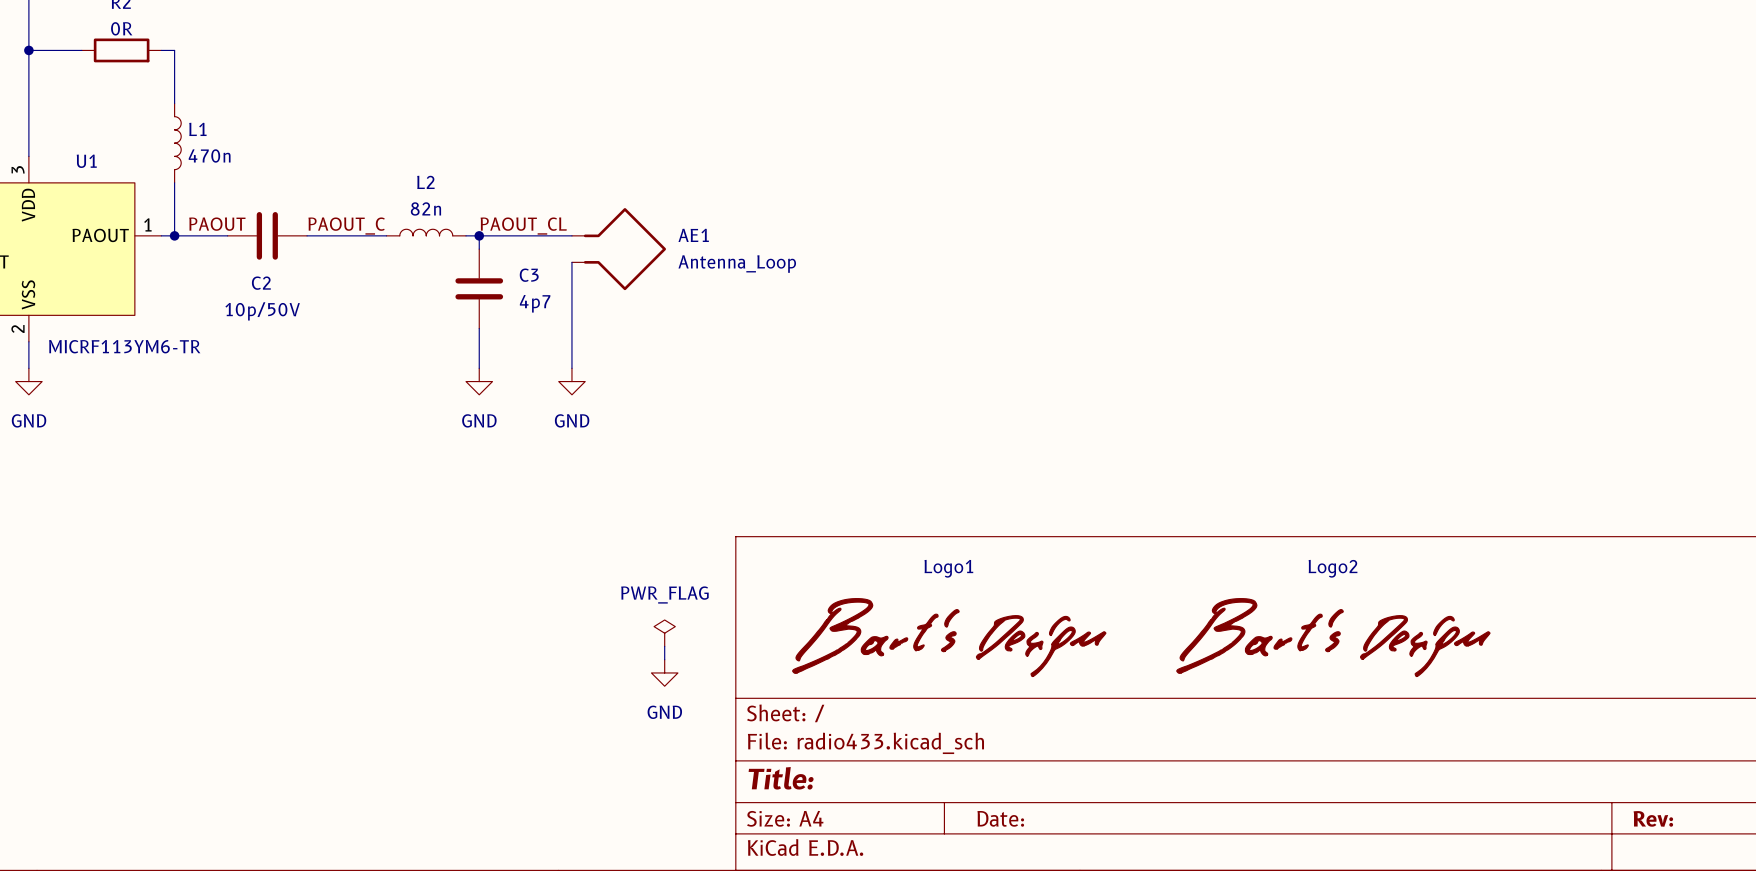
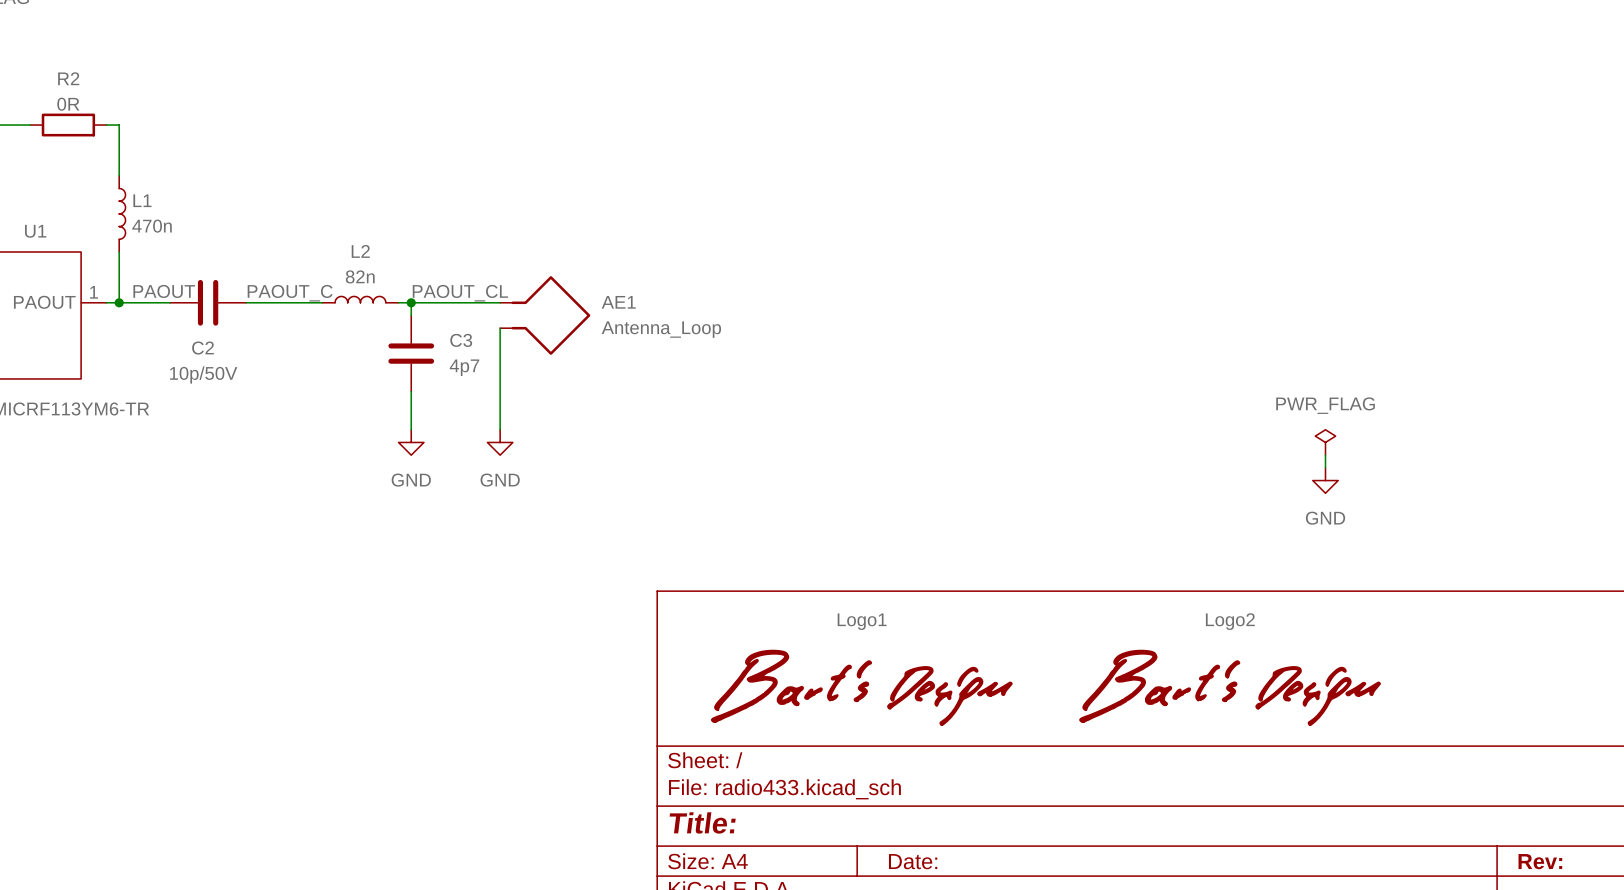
power symbol: none -> PWR_FLAG (1325, 442)
wire: none -> (1325, 455) (1325, 467)
power symbol: none -> GND (1325, 480)
power symbol: PWR_FLAG (664, 633) -> none
wire: (664, 646) (664, 659) -> none
power symbol: GND (664, 672) -> none

